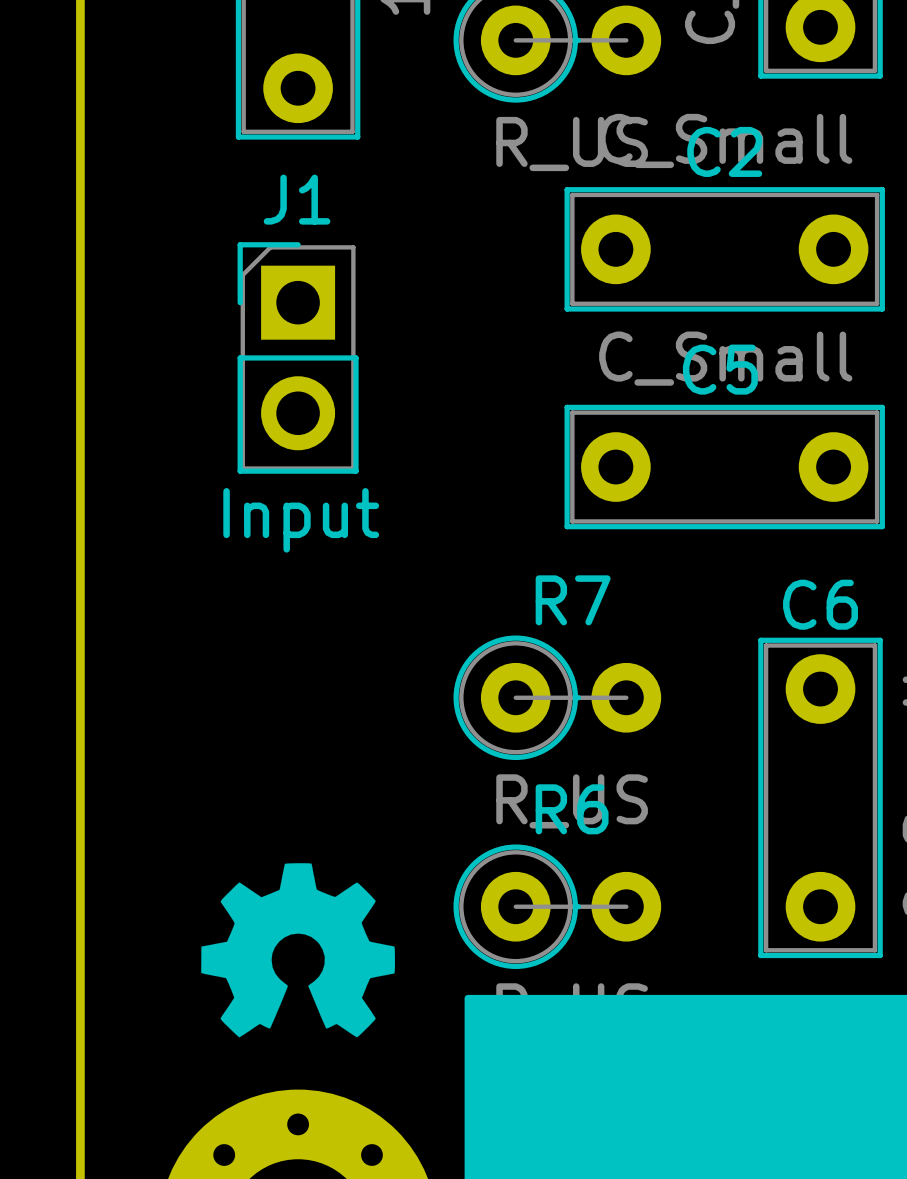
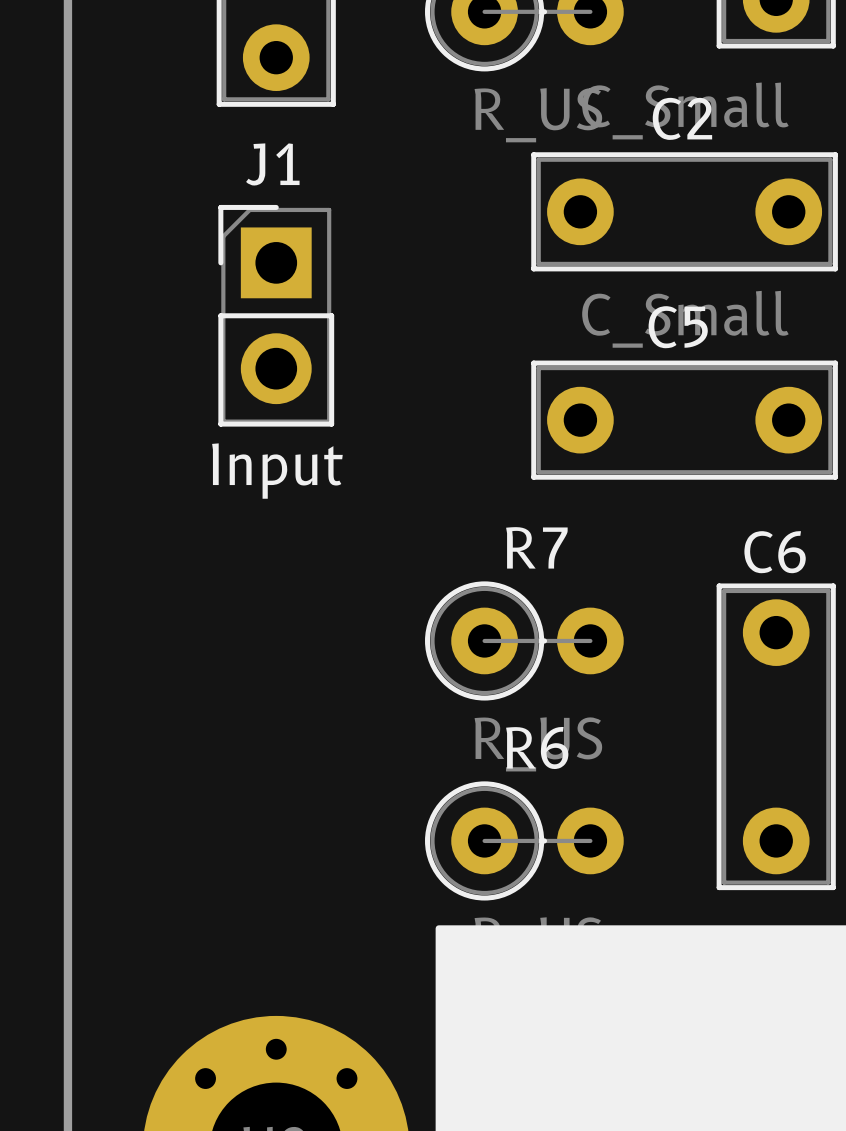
drawing: [201, 863, 396, 1038] -> none

